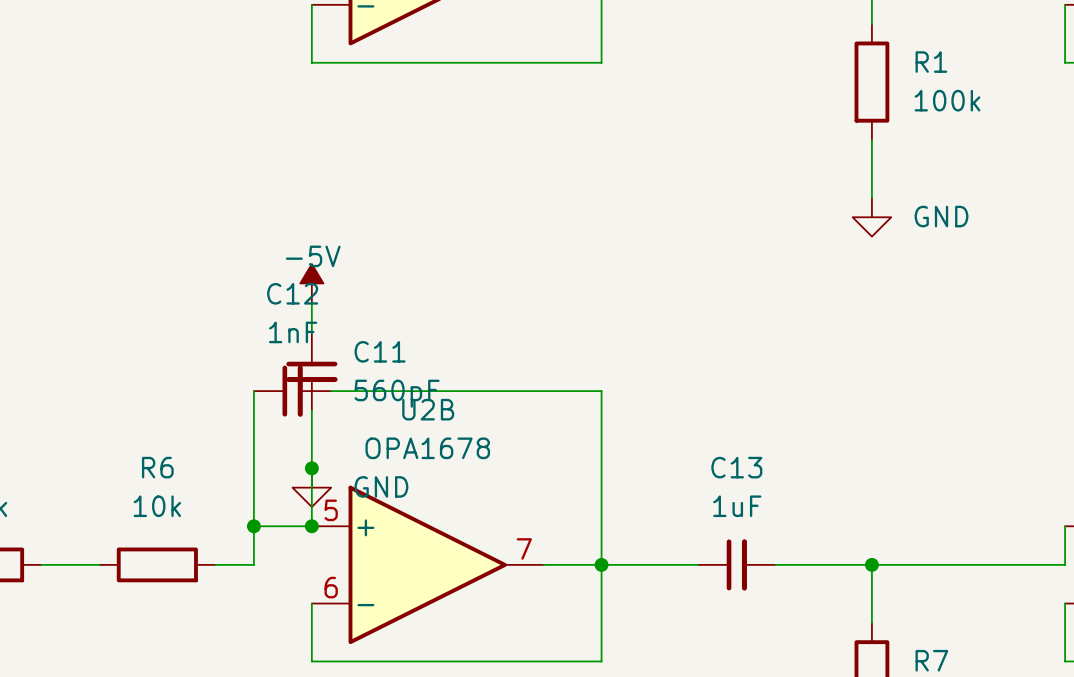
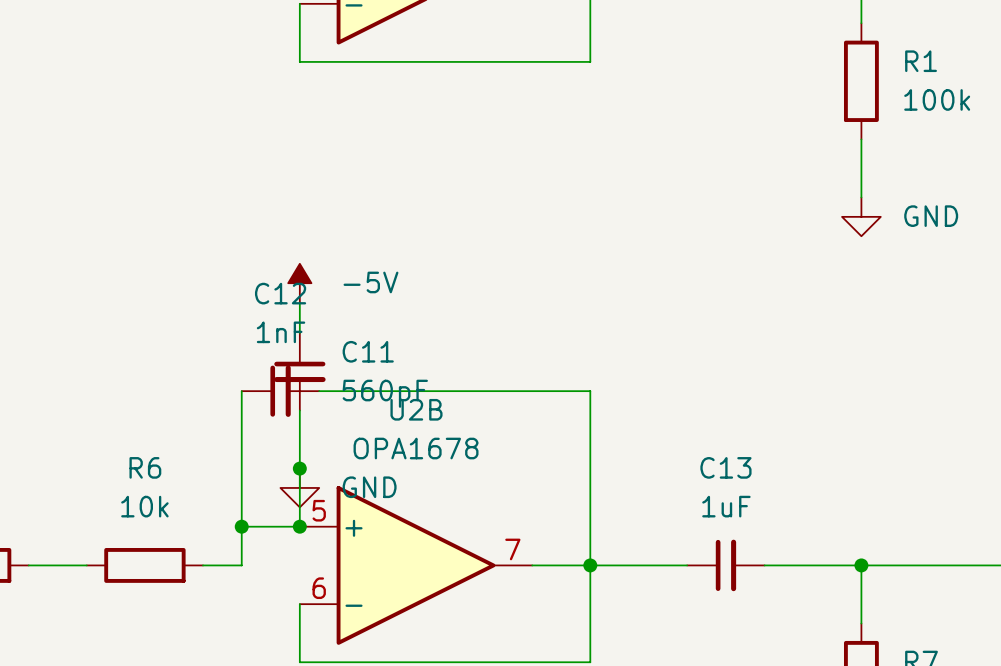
power symbol text position: -5V (313, 256) -> -5V (370, 282)

